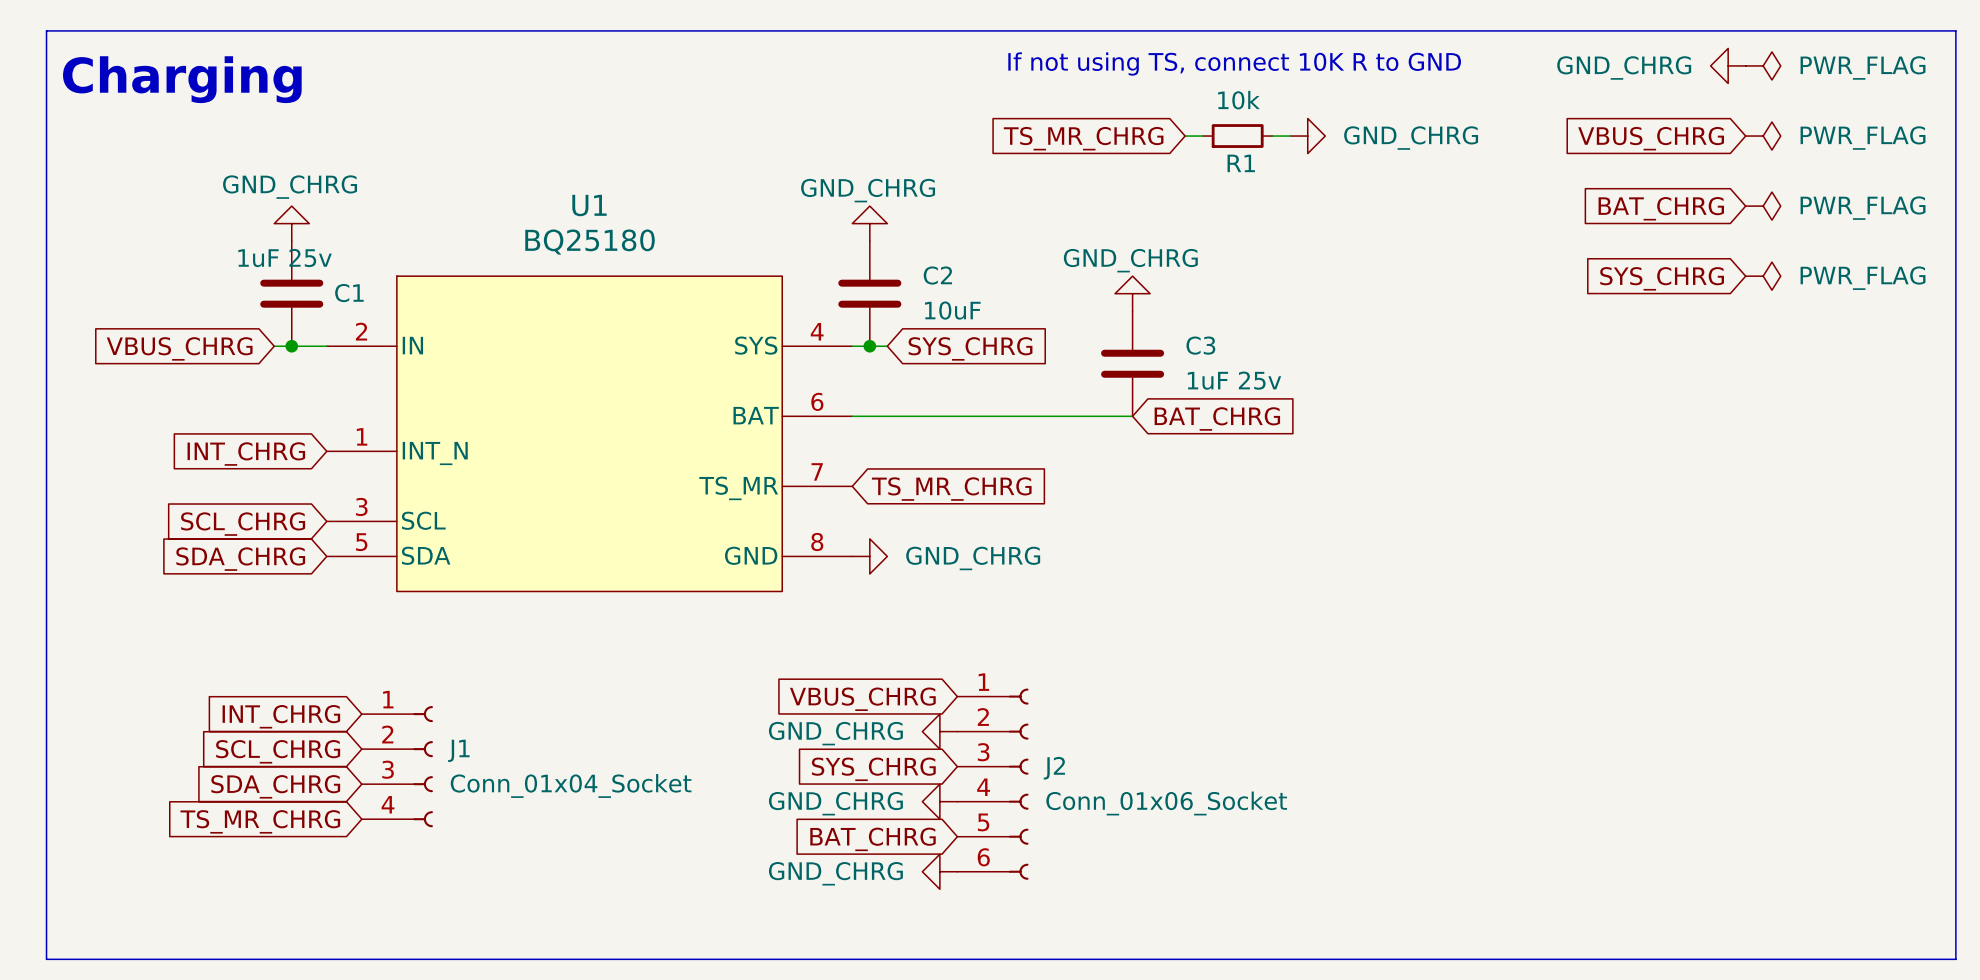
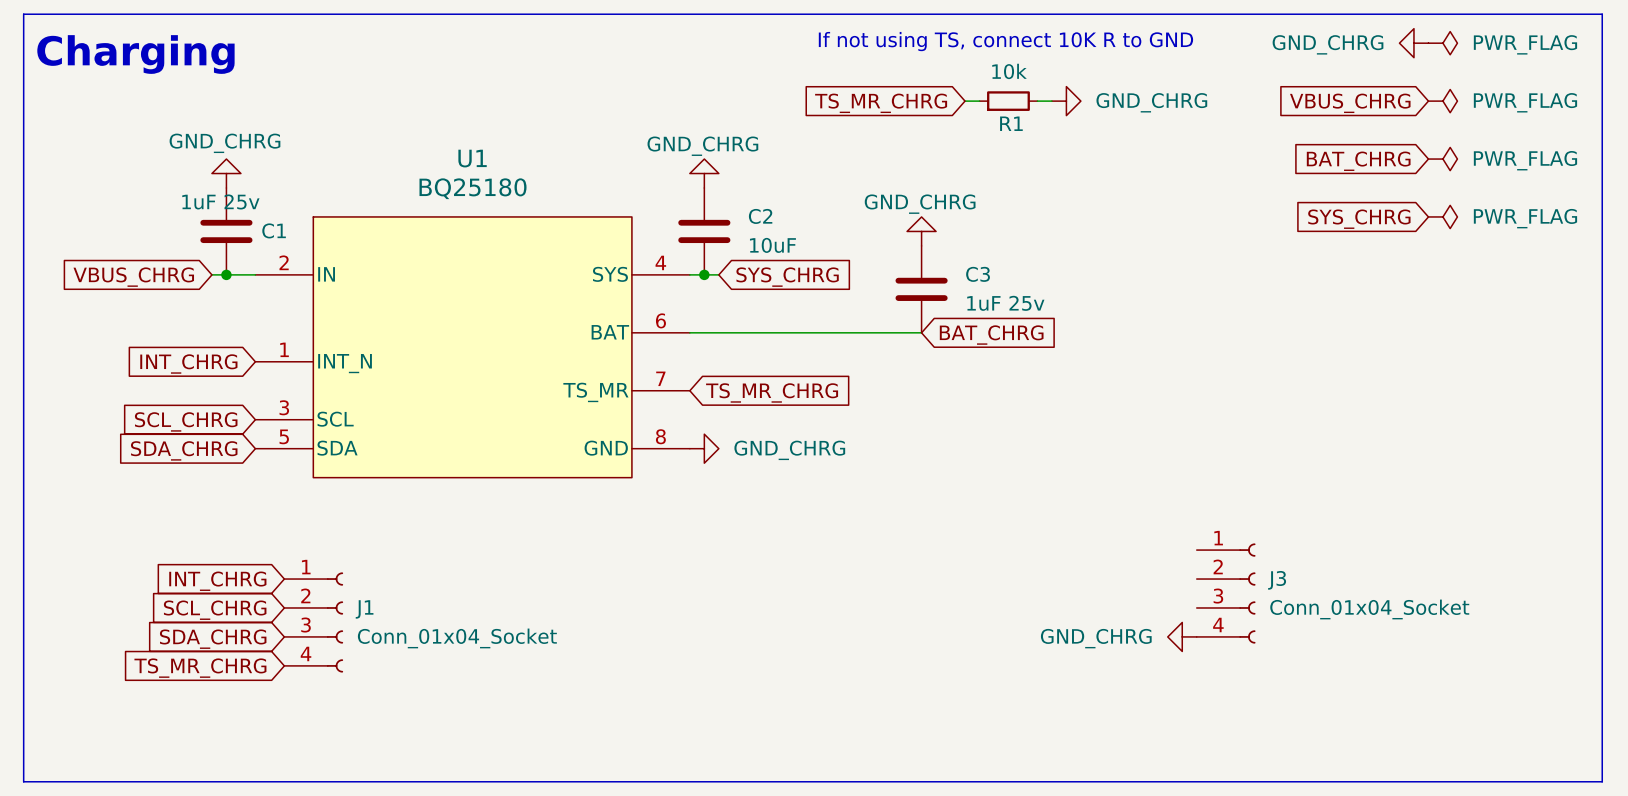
global label: VBUS_CHRG (862, 699) -> none
power symbol: GND_CHRG (939, 731) -> none
J3: none -> Conn_01x04_Socket (1226, 593)
global label: SYS_CHRG (873, 769) -> none
J2: Conn_01x06_Socket (992, 784) -> none
power symbol: none -> GND_CHRG (1182, 636)
power symbol: GND_CHRG (939, 801) -> none
global label: BAT_CHRG (873, 839) -> none
power symbol: GND_CHRG (939, 871) -> none

